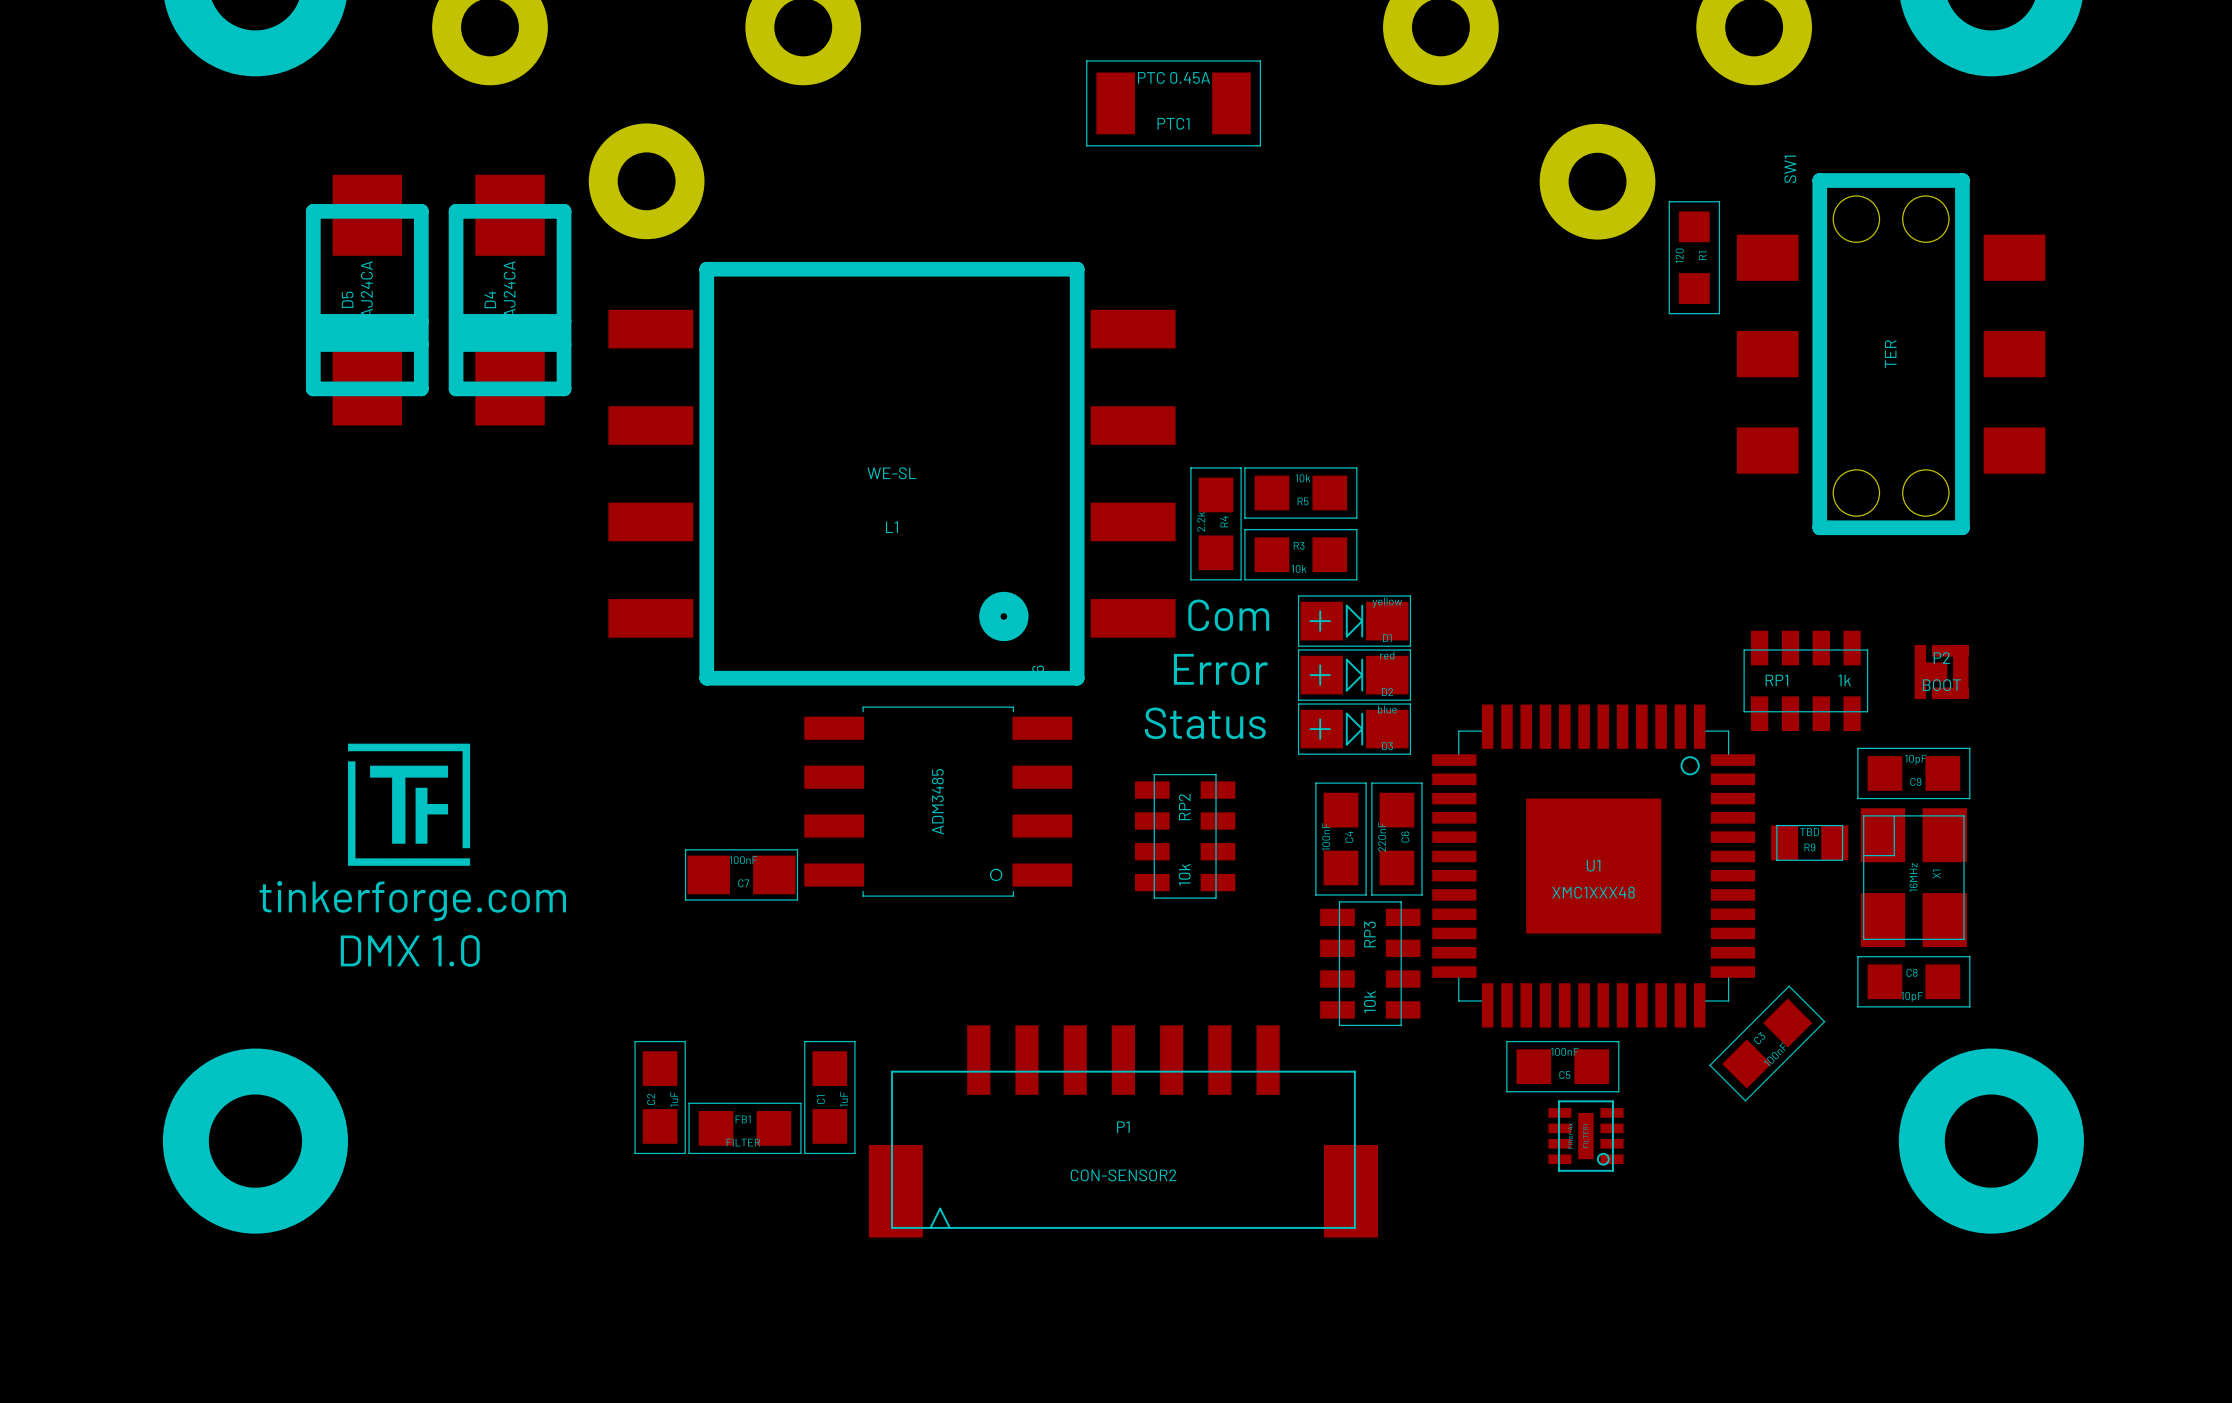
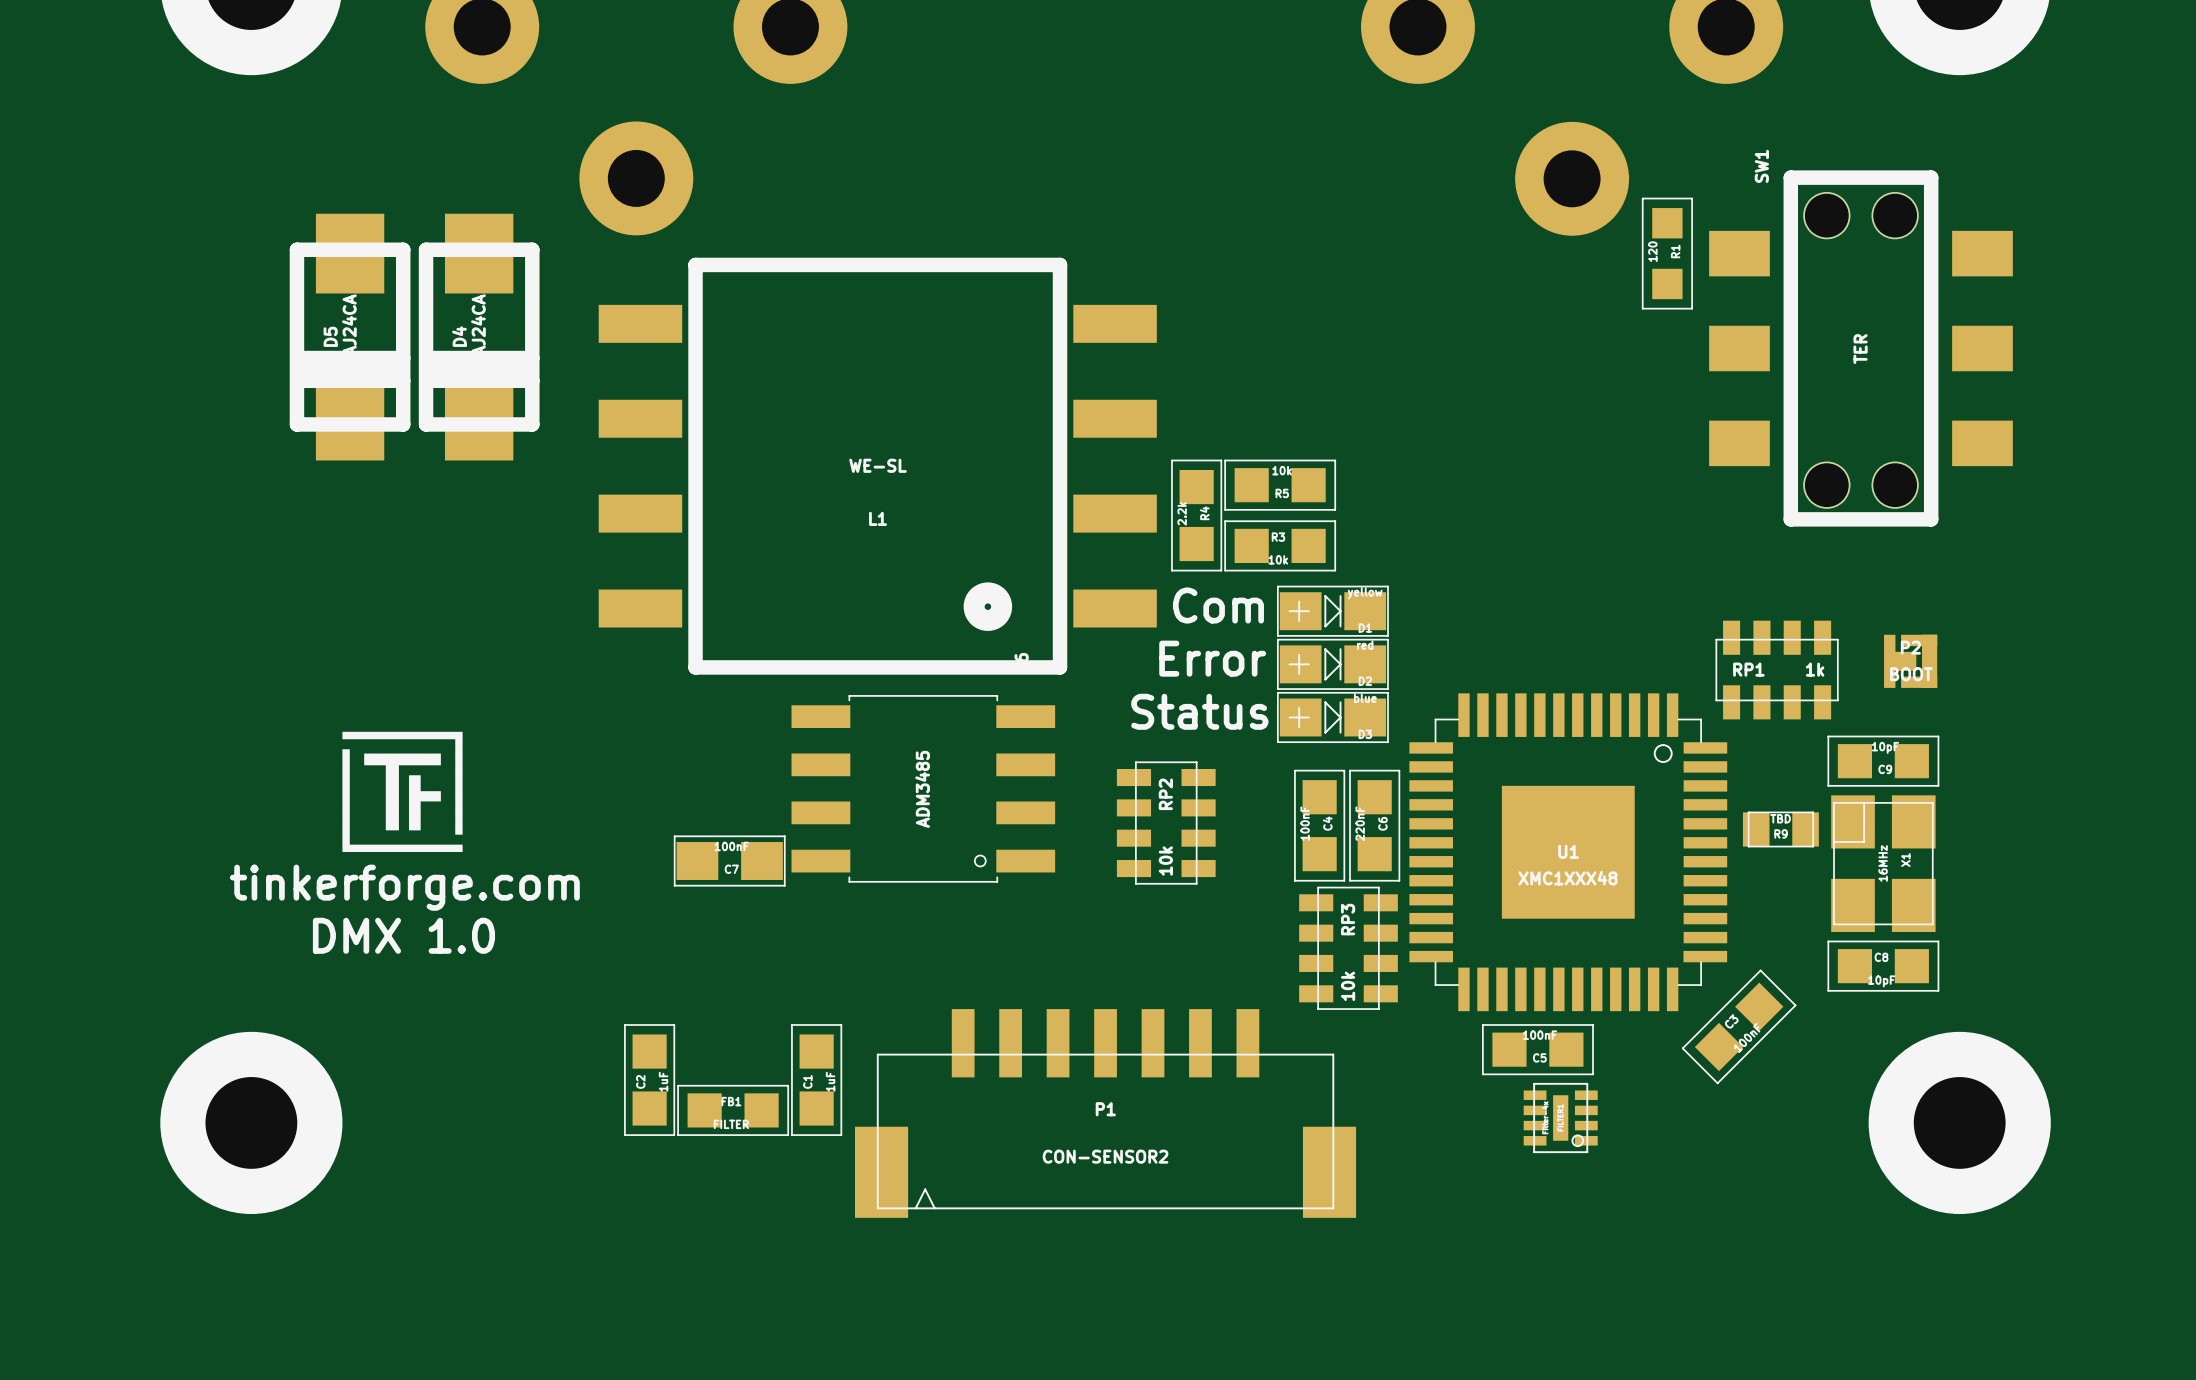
PTC1: PTC 0.45A (1173, 103) -> none
D5 position: (367, 300) -> (350, 337)
D4 position: (510, 300) -> (479, 337)

